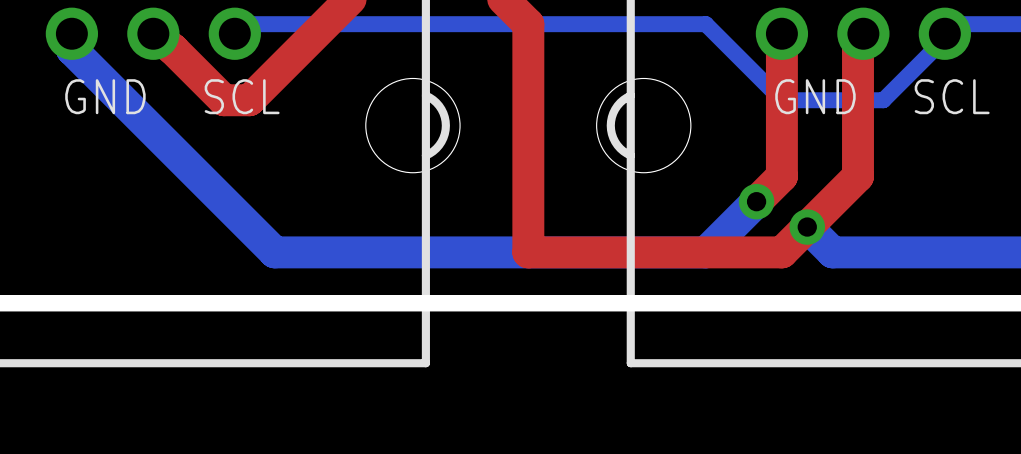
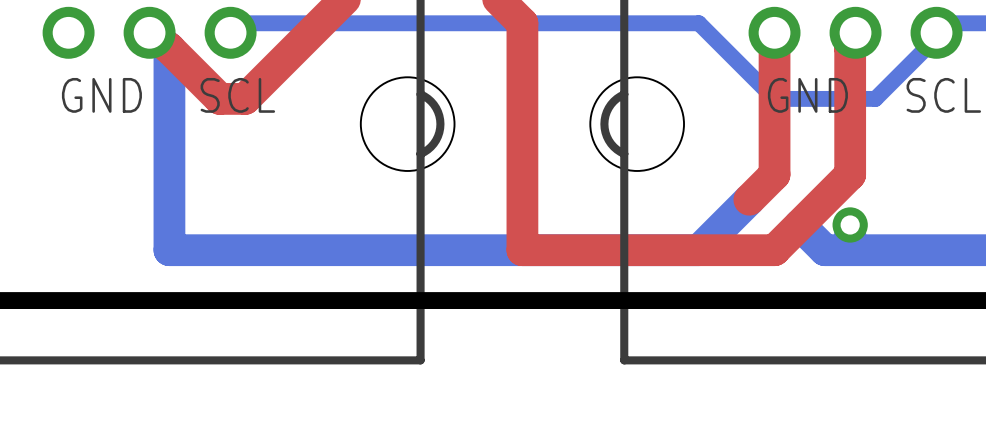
bottom track: (71, 33) (71, 49) (274, 252) -> (149, 32) (169, 48) (169, 250) (270, 250)
via: (756, 201) -> none
via position: (807, 227) -> (850, 224)

